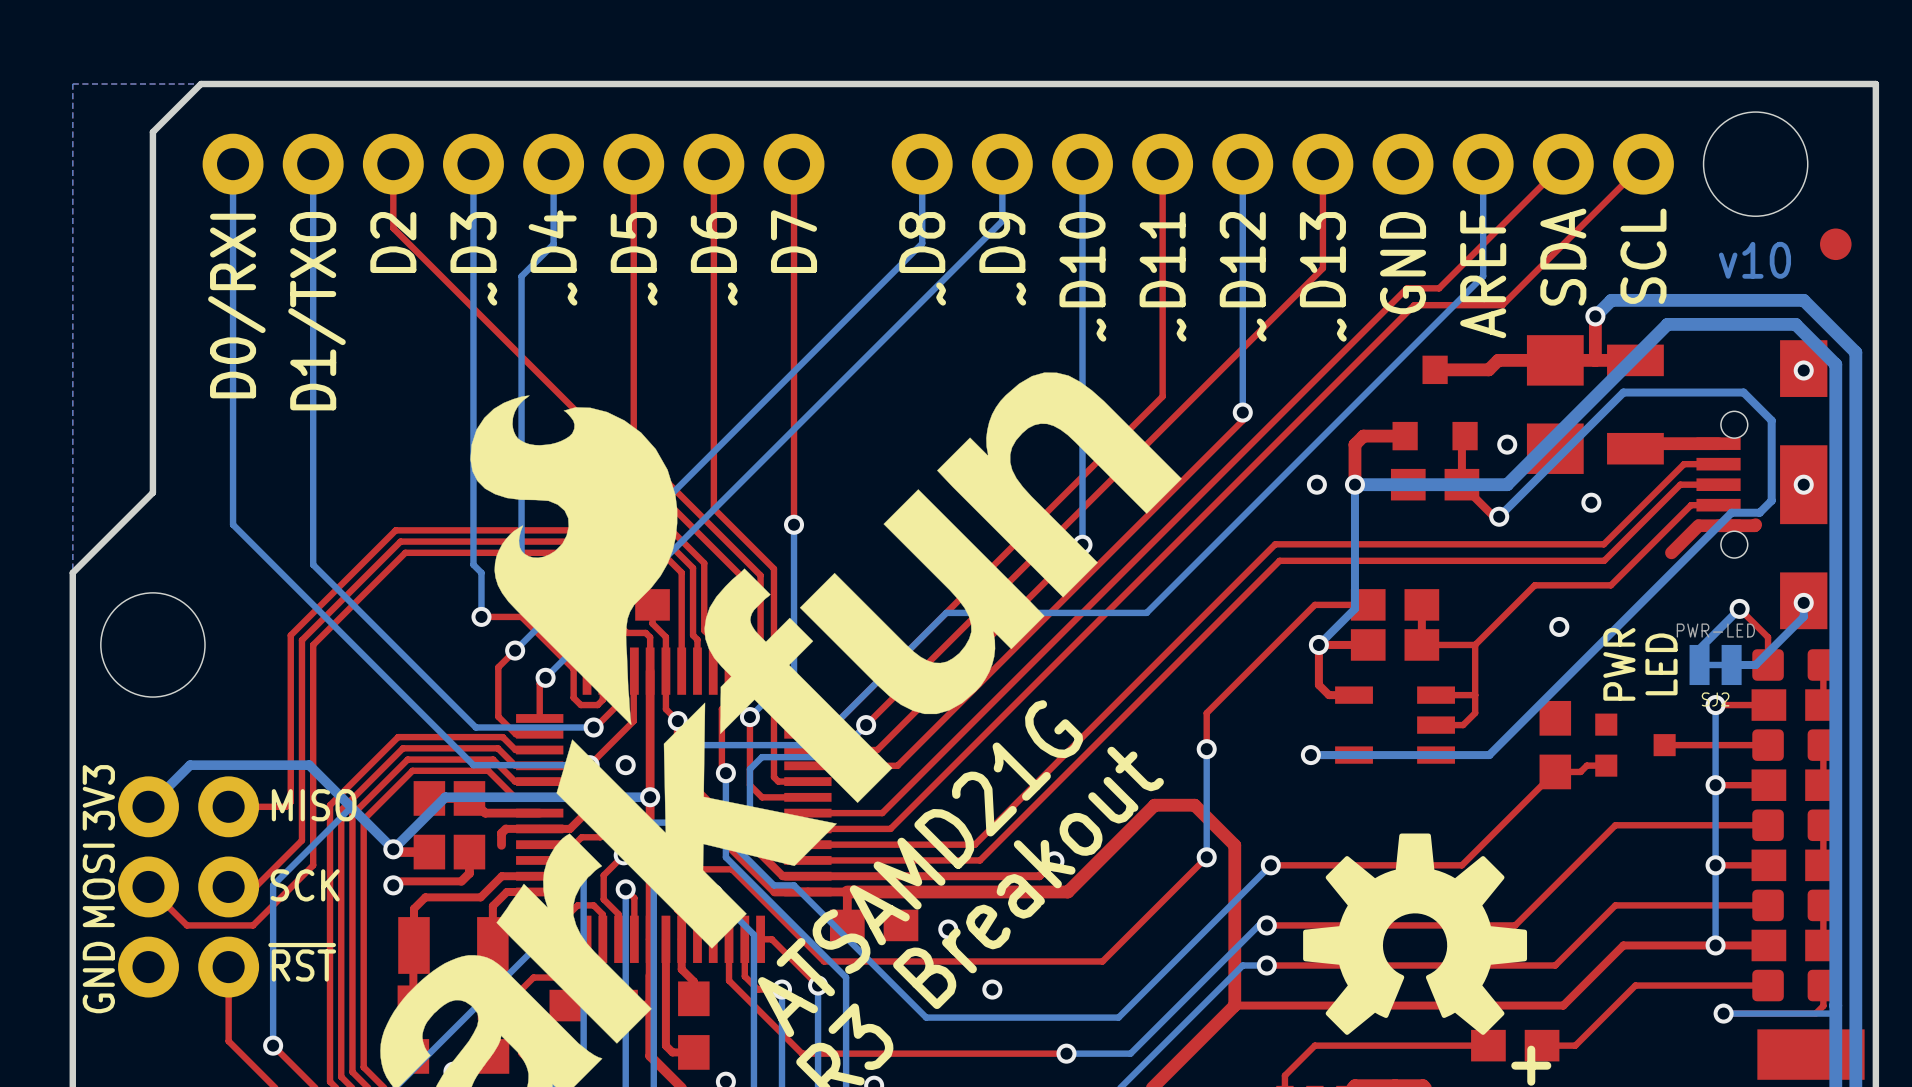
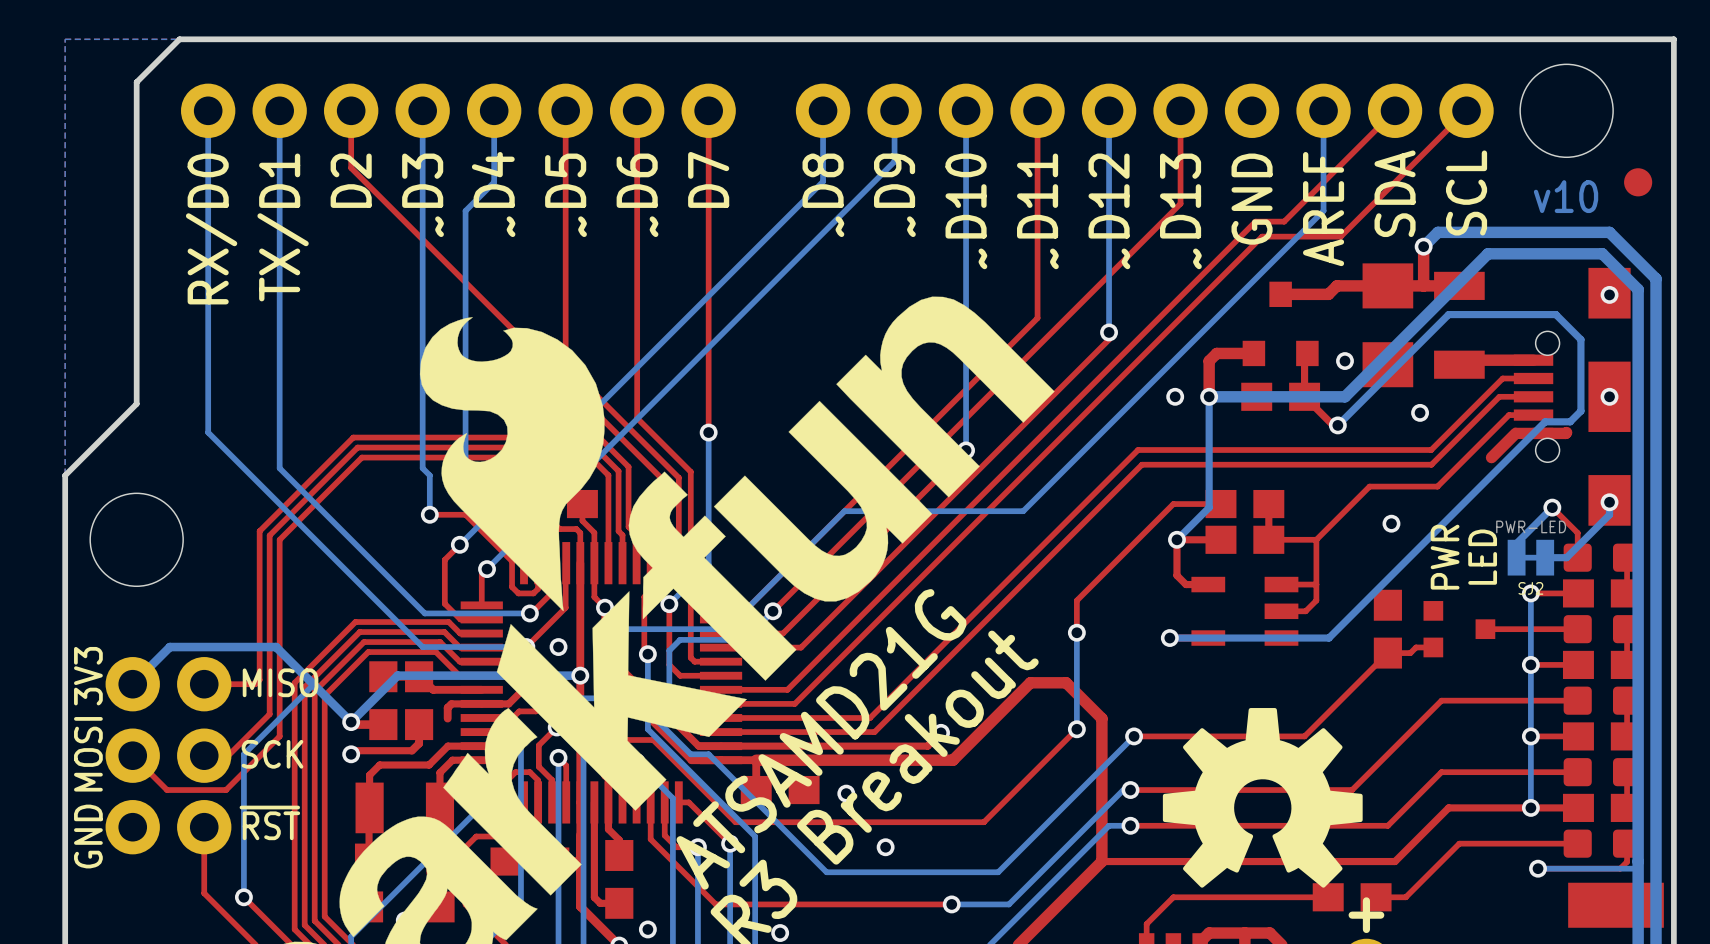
text: D0/RXI (236, 306) -> RX/D0 (211, 228)
text: D1/TXO (317, 311) -> TX/D1 (283, 227)

